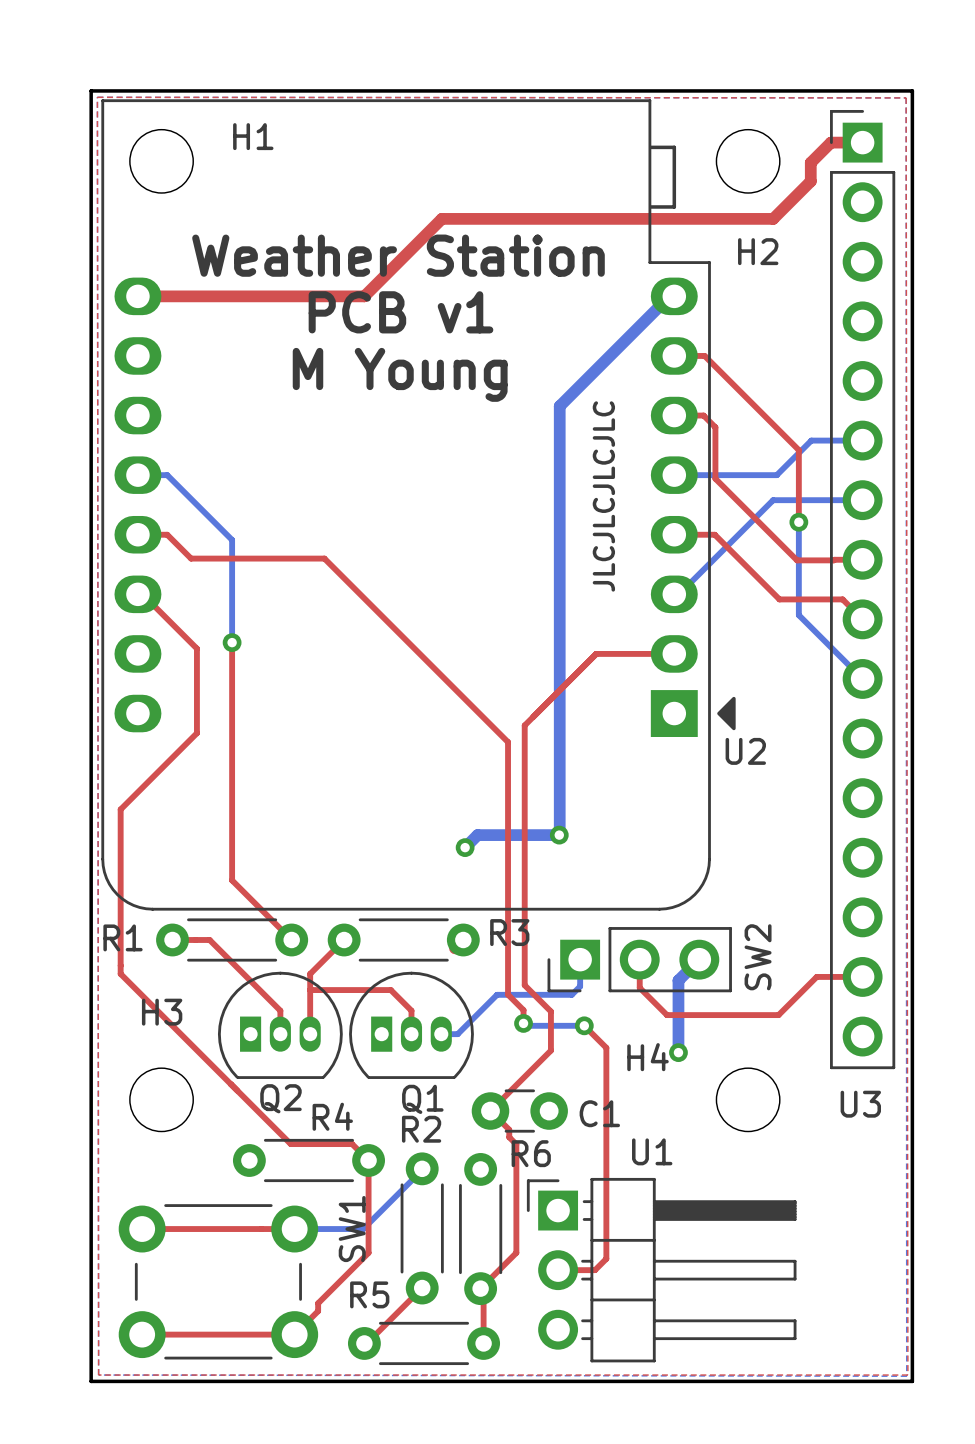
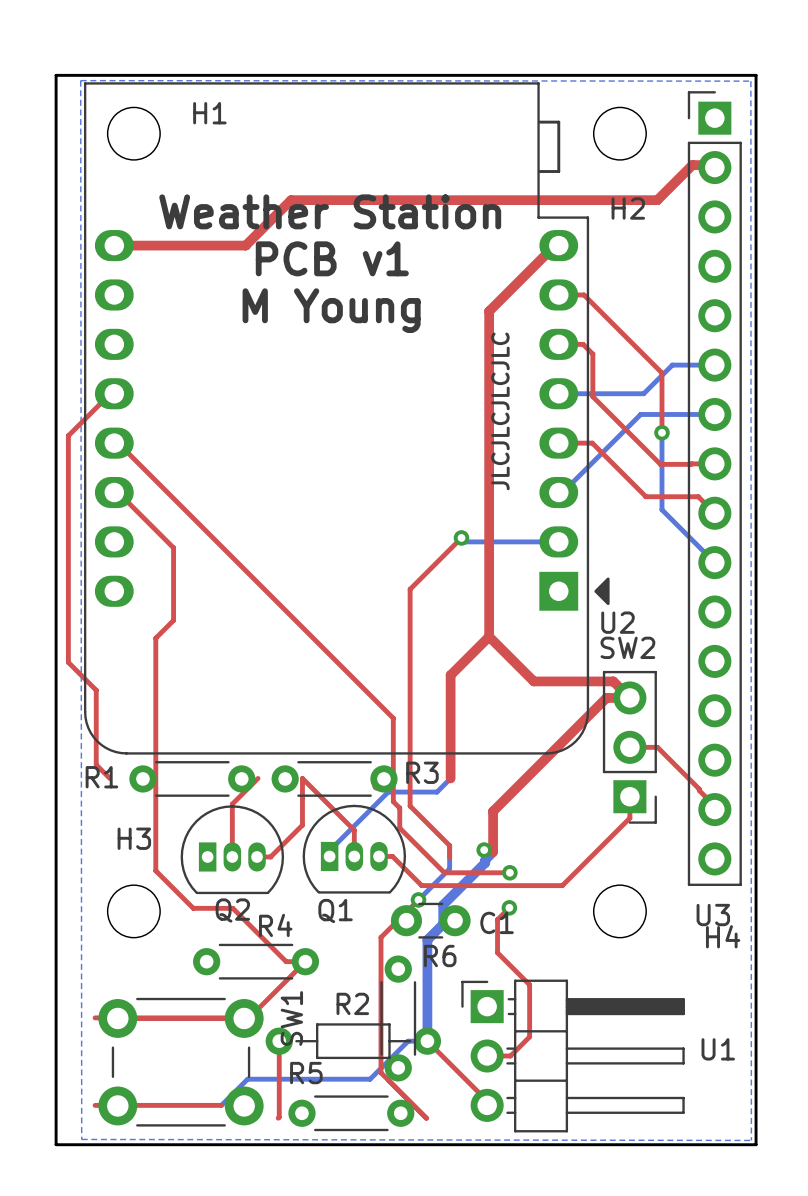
board edge: (91, 90) (91, 1381) -> (75, 75) (56, 75) (56, 1144) (75, 1144)
top zone outline: (97, 97) (98, 1375) (907, 1375) (906, 97) (97, 97) -> none
top track: (862, 142) (830, 142) (810, 162) (810, 181) (773, 218) (441, 218) (364, 296) (296, 296) -> (715, 165) (692, 165) (657, 200) (291, 200) (245, 245)
top track: none -> (558, 245) (554, 245) (489, 311) (489, 636)
bottom track: (674, 296) (669, 296) (559, 406) (559, 836) -> none
top track: none -> (114, 393) (110, 393) (68, 435) (68, 662) (96, 690) (96, 764) (109, 778)
bottom track: (137, 475) (167, 475) (232, 539) (232, 642) -> none
top track: (142, 534) (167, 534) (191, 558) (324, 558) (508, 742) (508, 994) (523, 1010) (523, 1023) -> (118, 443) (393, 718) (393, 801) (399, 808) (399, 828) (444, 872) (509, 872)
top track: (232, 642) (232, 880) (291, 939) -> none
via: (232, 642) -> none
top track: (196, 648) (196, 733) (120, 809) (120, 973) (290, 1144) (352, 1144) (368, 1160) (368, 1252) (318, 1303) (318, 1311) (294, 1334) -> (163, 537) (173, 547) (173, 620) (155, 638) (155, 870) (193, 908) (232, 908) (286, 961) (305, 961) (249, 1017) (95, 1017)
top track: none -> (461, 537) (410, 589) (410, 806) (449, 845) (449, 857)
bottom track: none -> (461, 537) (465, 541) (558, 541)
via: none -> (461, 537)
top track: (674, 653) (596, 653) (524, 725) (524, 985) (550, 1011) (550, 1050) (490, 1111) (509, 1129) (509, 1137) (516, 1144) (516, 1252) (480, 1288) (483, 1291) (483, 1343) -> none
top track: none -> (489, 636) (533, 681) (613, 681) (629, 697) (606, 697) (493, 811) (493, 852)
top track: none -> (489, 636) (450, 675) (450, 778)
bottom track: (559, 835) (477, 835) (465, 847) -> none
via: (559, 835) -> none
via: (465, 847) -> none
top track: none -> (629, 747) (657, 747) (715, 807)
top track: (172, 939) (209, 939) (280, 1010) -> (258, 778) (232, 804) (232, 837)
top track: (344, 939) (310, 973) (310, 1034) -> (354, 856) (354, 830) (302, 778) (302, 825) (270, 856) (257, 856)
bottom track: none -> (450, 778) (437, 792) (388, 792) (329, 850) (329, 856)
bottom track: (580, 959) (580, 986) (571, 994) (497, 994) (457, 1034) (441, 1034) -> none
top track: (639, 959) (639, 987) (666, 1015) (778, 1015) (816, 976) (862, 976) -> none
SW2 rotation: 0° (639, 959) -> 90° counterclockwise (629, 747)
SW2 position: (639, 959) -> (629, 747)
bottom track: (699, 959) (678, 980) (678, 1052) -> none
top track: none -> (629, 796) (629, 818) (562, 885) (421, 885) (392, 856) (379, 856)
top track: (310, 990) (390, 990) (411, 1010) (411, 1034) -> none
bottom track: none -> (449, 845) (449, 868) (418, 899)
bottom track: (523, 1023) (525, 1025) (584, 1025) -> none
via: (523, 1023) -> none
Q1 position: (411, 1025) -> (354, 849)
top track: (584, 1025) (606, 1047) (606, 1258) (595, 1270) (565, 1270) -> none
bottom track: none -> (493, 852) (485, 859) (485, 862) (443, 904) (443, 924) (427, 939) (427, 1041) (408, 1041) (370, 1079) (247, 1079) (221, 1105)
via: (678, 1052) -> none
via: none -> (509, 872)
H4 name position: H4 (648, 1057) -> H4 (723, 936)
top track: none -> (418, 899) (380, 937) (380, 1072) (426, 1118)
via: none -> (418, 899)
top track: none -> (509, 907) (497, 919) (497, 952) (529, 984) (529, 1036) (510, 1055) (487, 1055)
via: none -> (509, 907)
Q1 name position: Q1 (422, 1099) -> Q1 (335, 911)
R2 name position: R2 (421, 1129) -> R2 (352, 1003)
U1 name position: U1 (652, 1151) -> U1 (718, 1049)
R2 footprint: [400, 1152, 444, 1305] -> [265, 1023, 442, 1060]
bottom track: (420, 1171) (363, 1229) (294, 1229) -> none
top track: none -> (279, 1041) (278, 1118)
top track: none -> (427, 1045) (427, 1041) (487, 1100) (487, 1105)
U1 position: (661, 1270) -> (573, 1055)
top track: (422, 1288) (366, 1343) (364, 1343) -> none
top track: (142, 1334) (294, 1334) -> (95, 1105) (221, 1105)

